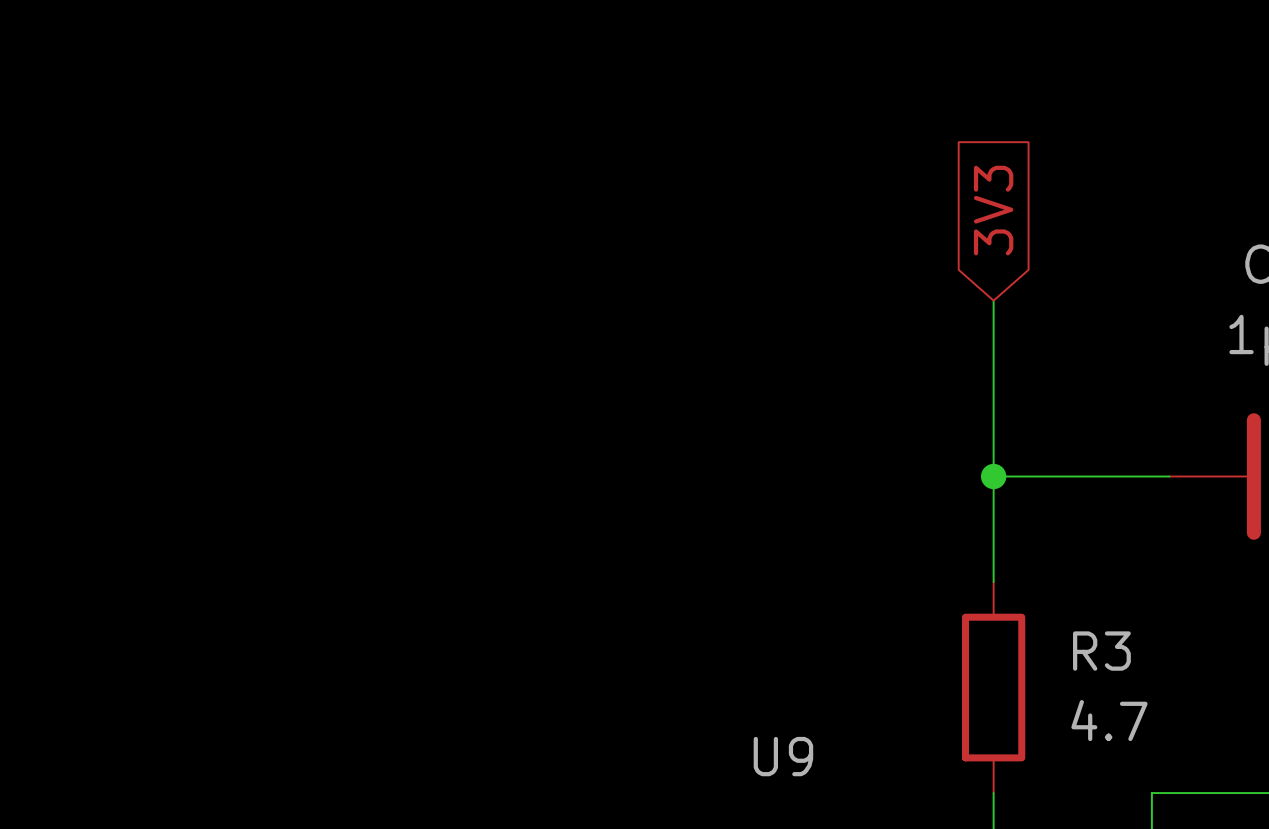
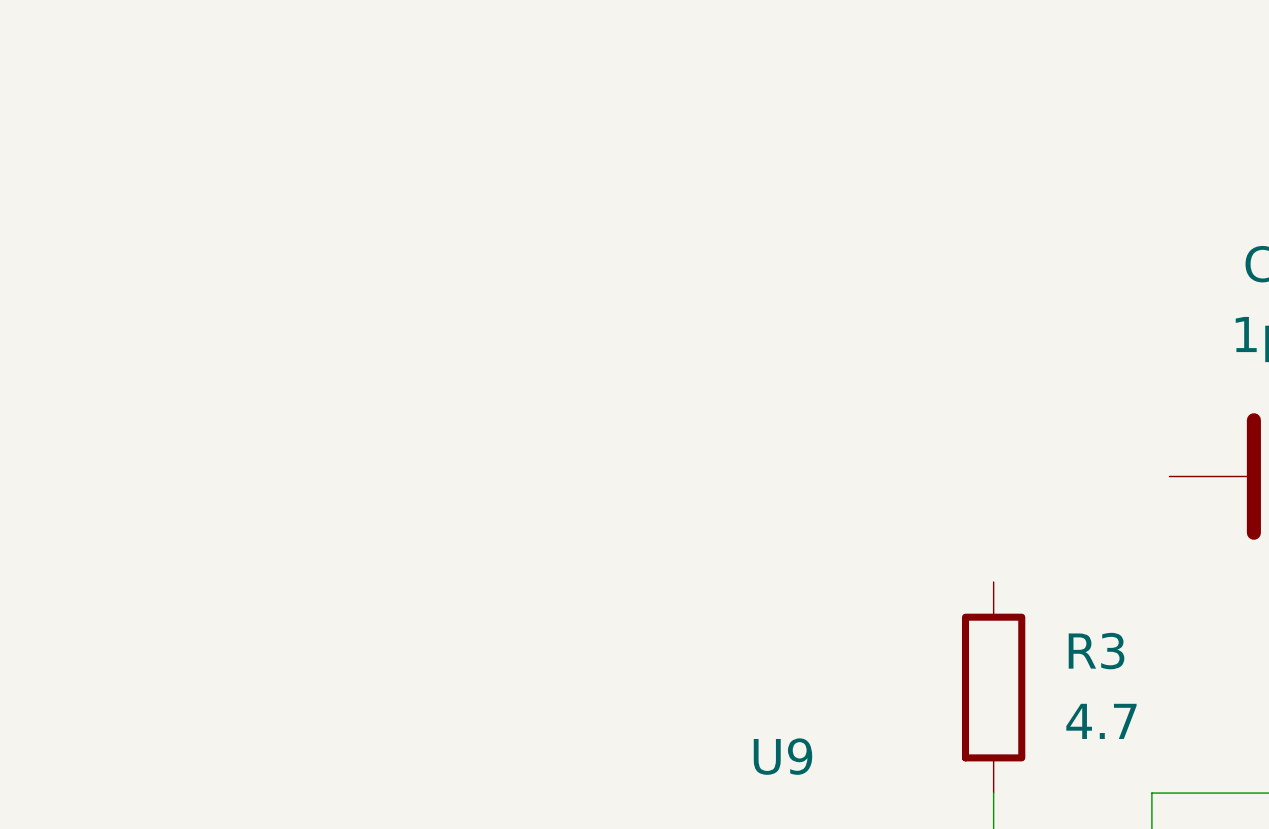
global label: 3V3 (993, 210) -> none
wire: (993, 300) (993, 582) -> none
wire: (993, 476) (1169, 476) -> none
junction: (993, 476) -> none

